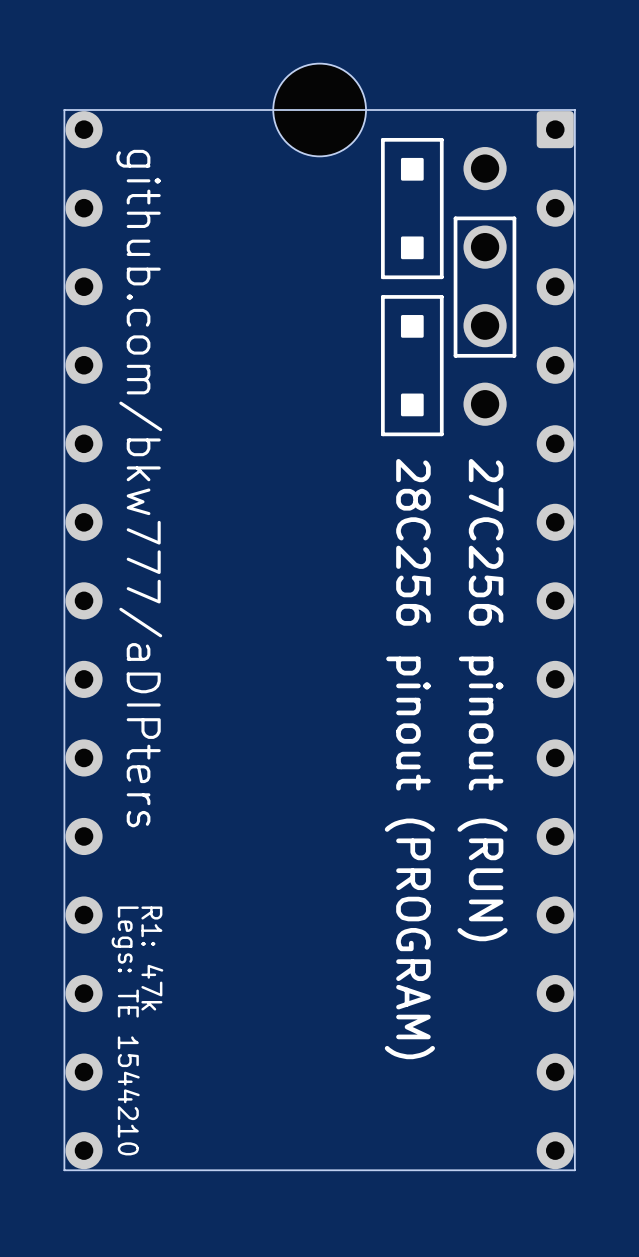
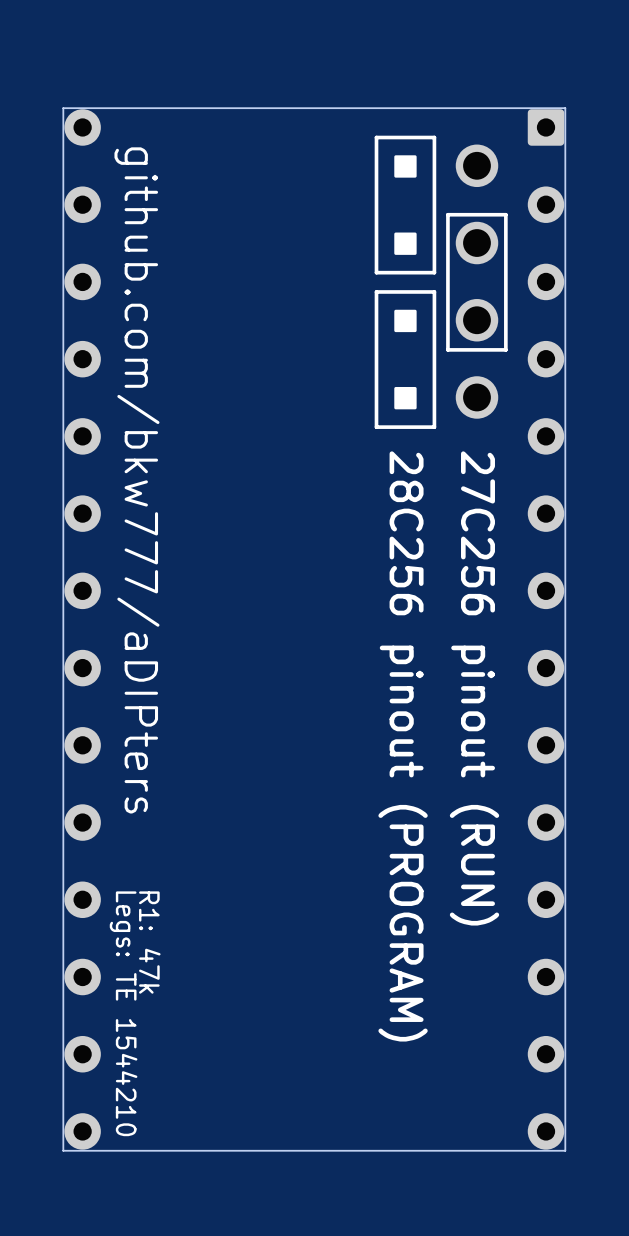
part: (319, 110) -> none

